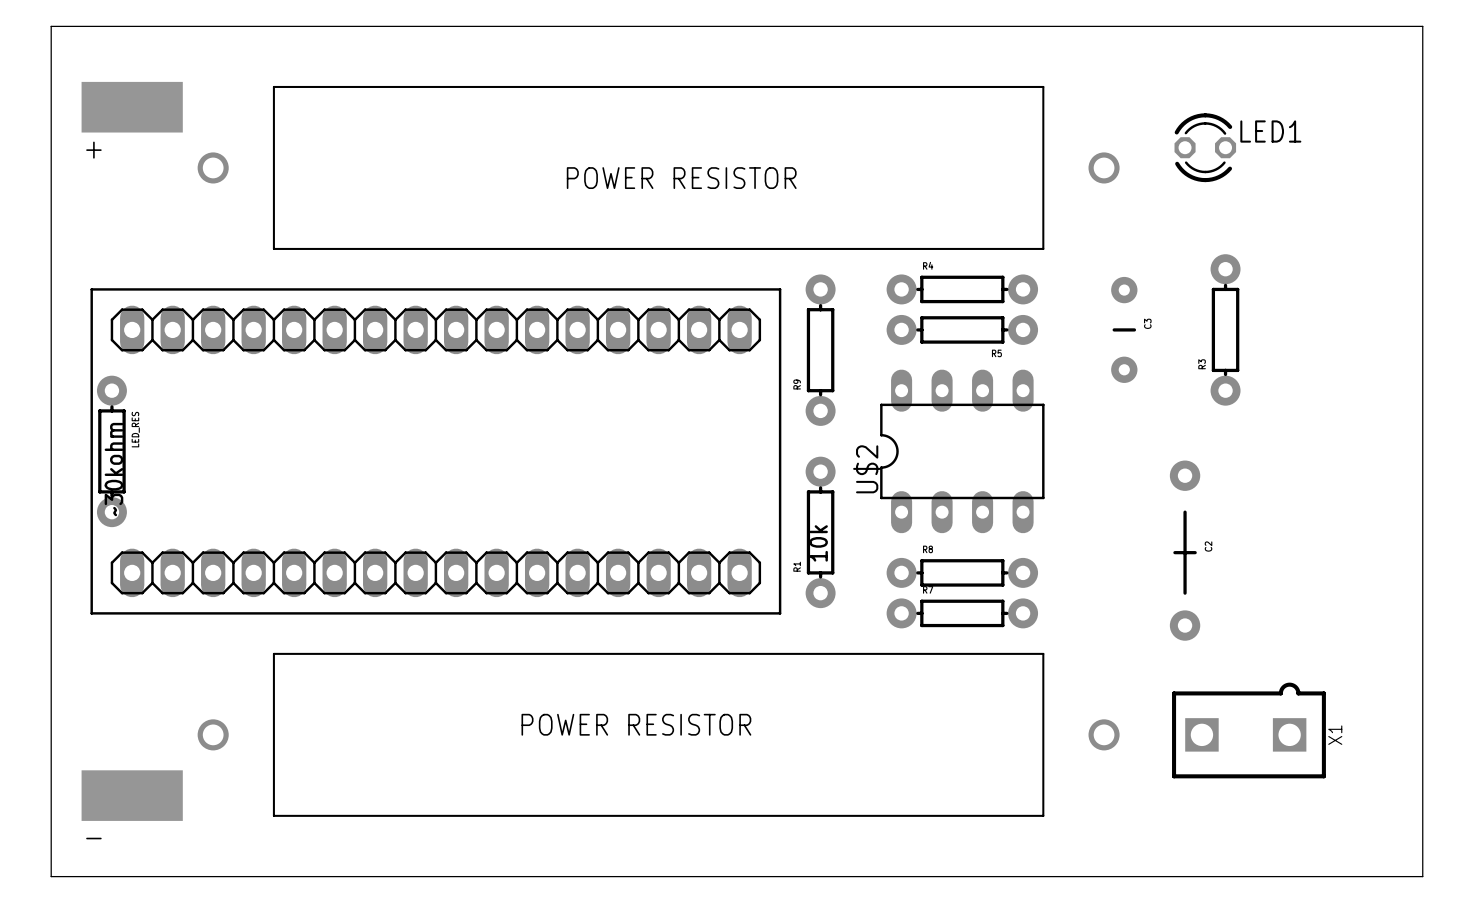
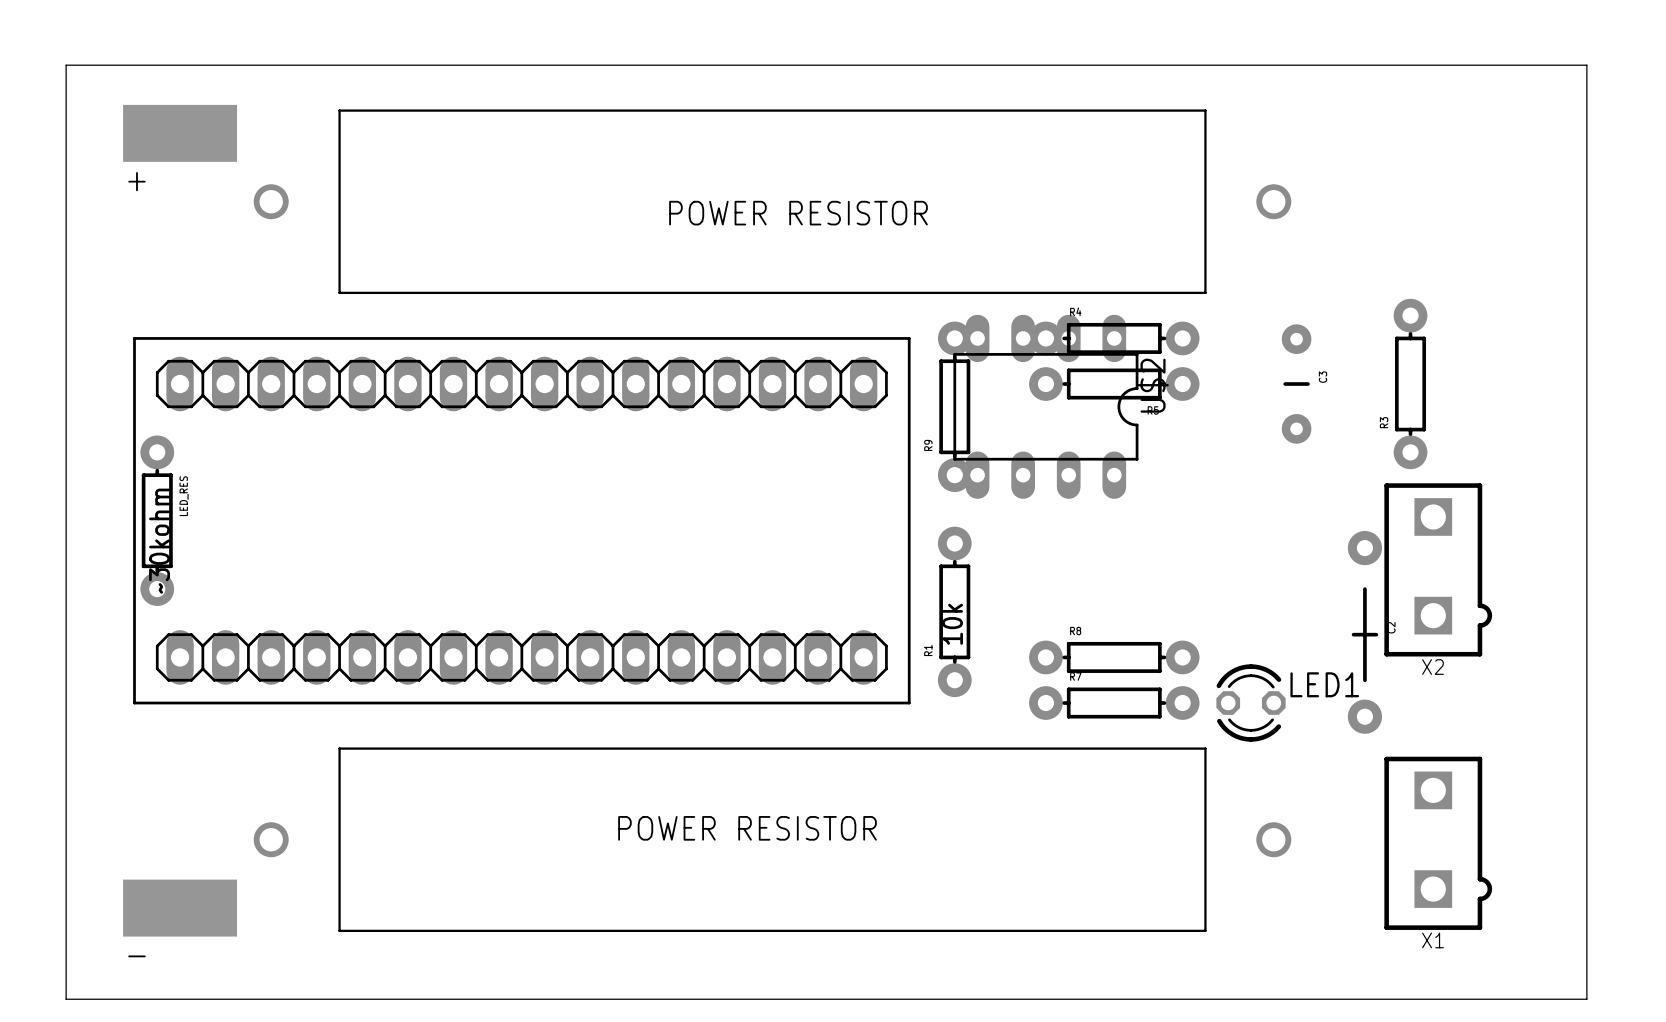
LED1 position: (1205, 147) -> (1251, 703)
U$2 rotation: 0° (962, 451) -> 180° (1045, 406)
U$2 position: (962, 451) -> (1045, 406)
X2: none -> (1438, 569)
X1 rotation: 0° (1248, 730) -> 90° clockwise (1438, 843)
board edge: (51, 876) (51, 26) (1422, 26) (1422, 876) (1382, 876) -> (88, 999) (66, 999) (66, 65) (1586, 65) (1586, 999)

